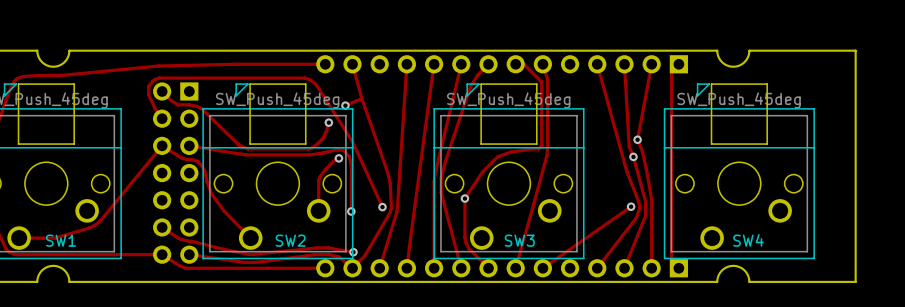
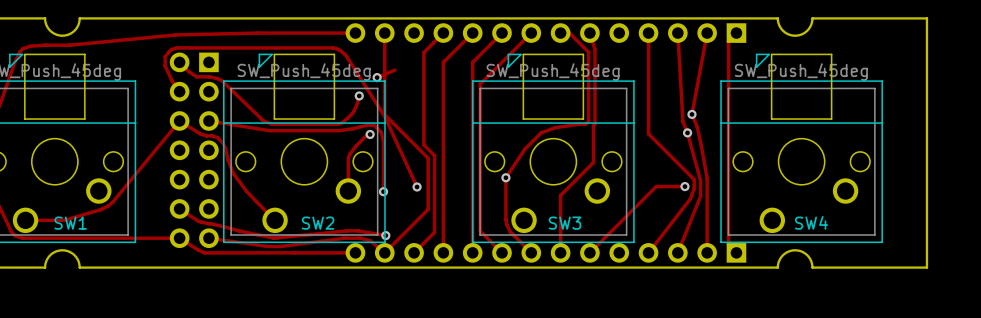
track: (352, 64) (390, 183) (390, 212) (364, 256) -> (384, 33) (384, 114) (428, 158) (428, 209) (397, 239)
track: (406, 64) (397, 207) (379, 268) -> (443, 33) (423, 52) (423, 144) (434, 155) (434, 232) (414, 252)
track: (434, 64) (406, 268) -> (472, 33) (443, 62) (443, 252)
track: (461, 64) (434, 182) -> (502, 33) (472, 62) (472, 159)
track: (597, 64) (626, 171) (639, 205) -> (648, 33) (648, 133) (694, 179) (694, 185)
track: (477, 74) (470, 86) (441, 177) -> (519, 44) (480, 84) (480, 155)
track: (547, 148) (515, 268) -> (595, 123) (593, 162) (560, 195) (560, 252)
track: (441, 192) (461, 268) -> (480, 171) (480, 231) (502, 252)
track: (631, 206) (542, 268) -> (684, 186) (656, 186) (589, 252)

